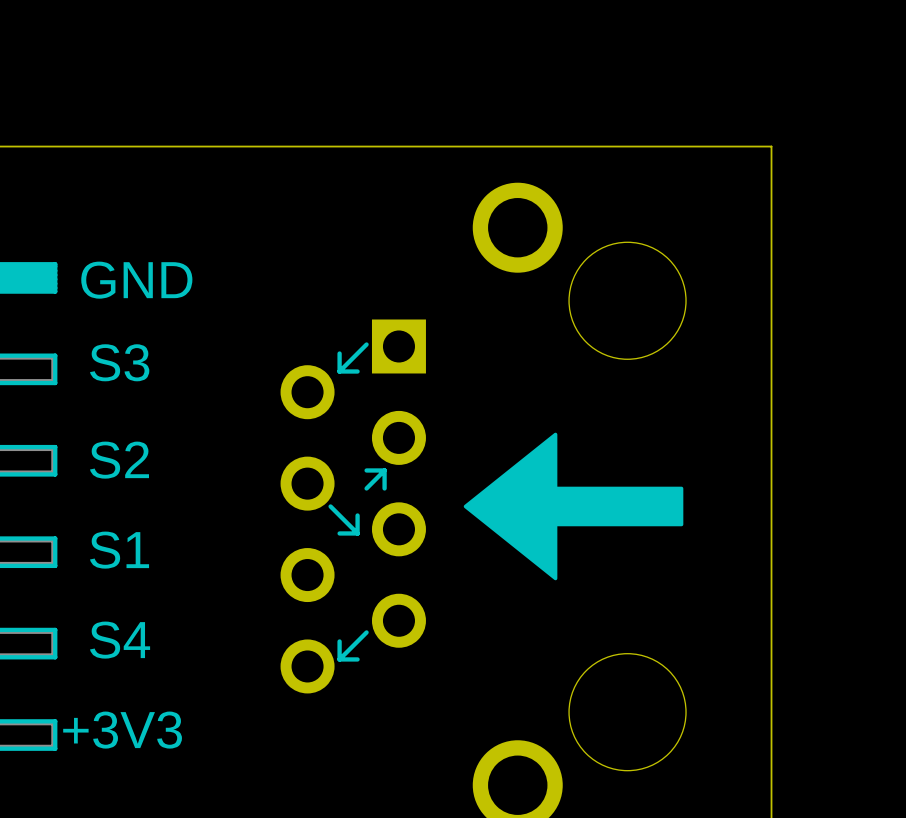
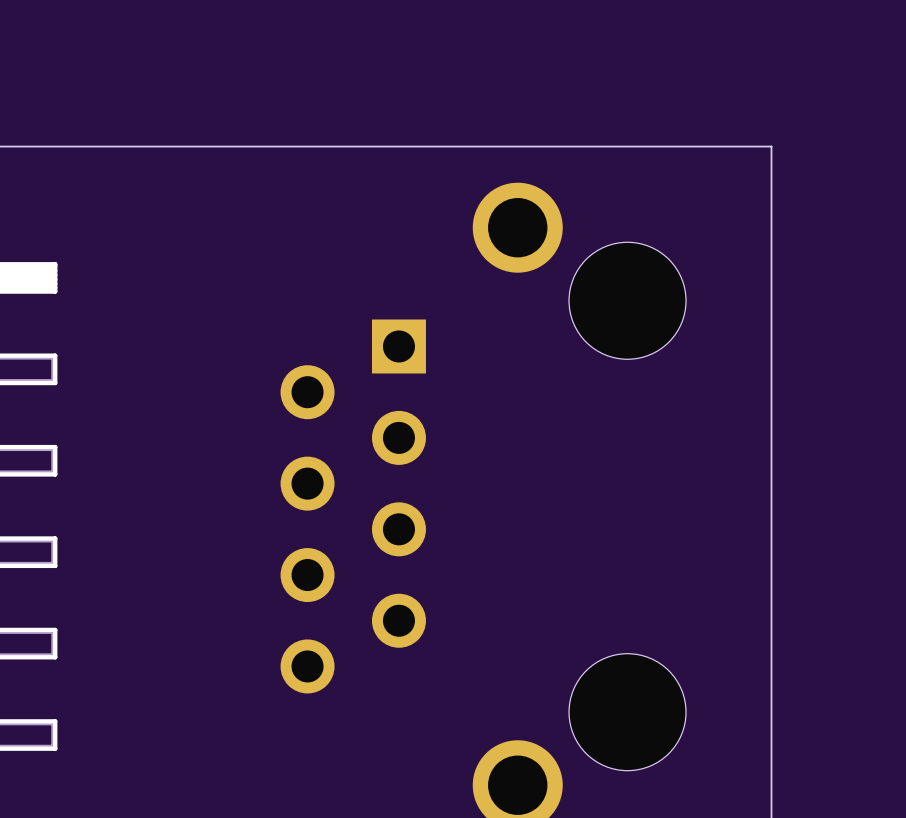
text: GND (136, 280) -> none
line: (366, 344) (339, 371) -> none
line: (339, 353) (339, 371) -> none
text: S3 (119, 362) -> none
line: (357, 371) (339, 371) -> none
drawing: [463, 432, 684, 581] -> none
text: S2 (119, 460) -> none
line: (384, 470) (366, 470) -> none
line: (384, 470) (384, 488) -> none
line: (384, 470) (366, 488) -> none
line: (330, 506) (357, 533) -> none
line: (357, 515) (357, 533) -> none
line: (357, 533) (339, 533) -> none
text: S1 (119, 550) -> none
line: (366, 632) (339, 659) -> none
text: S4 (120, 640) -> none
line: (339, 641) (339, 659) -> none
line: (357, 659) (339, 659) -> none
text: +3V3 (122, 730) -> none

